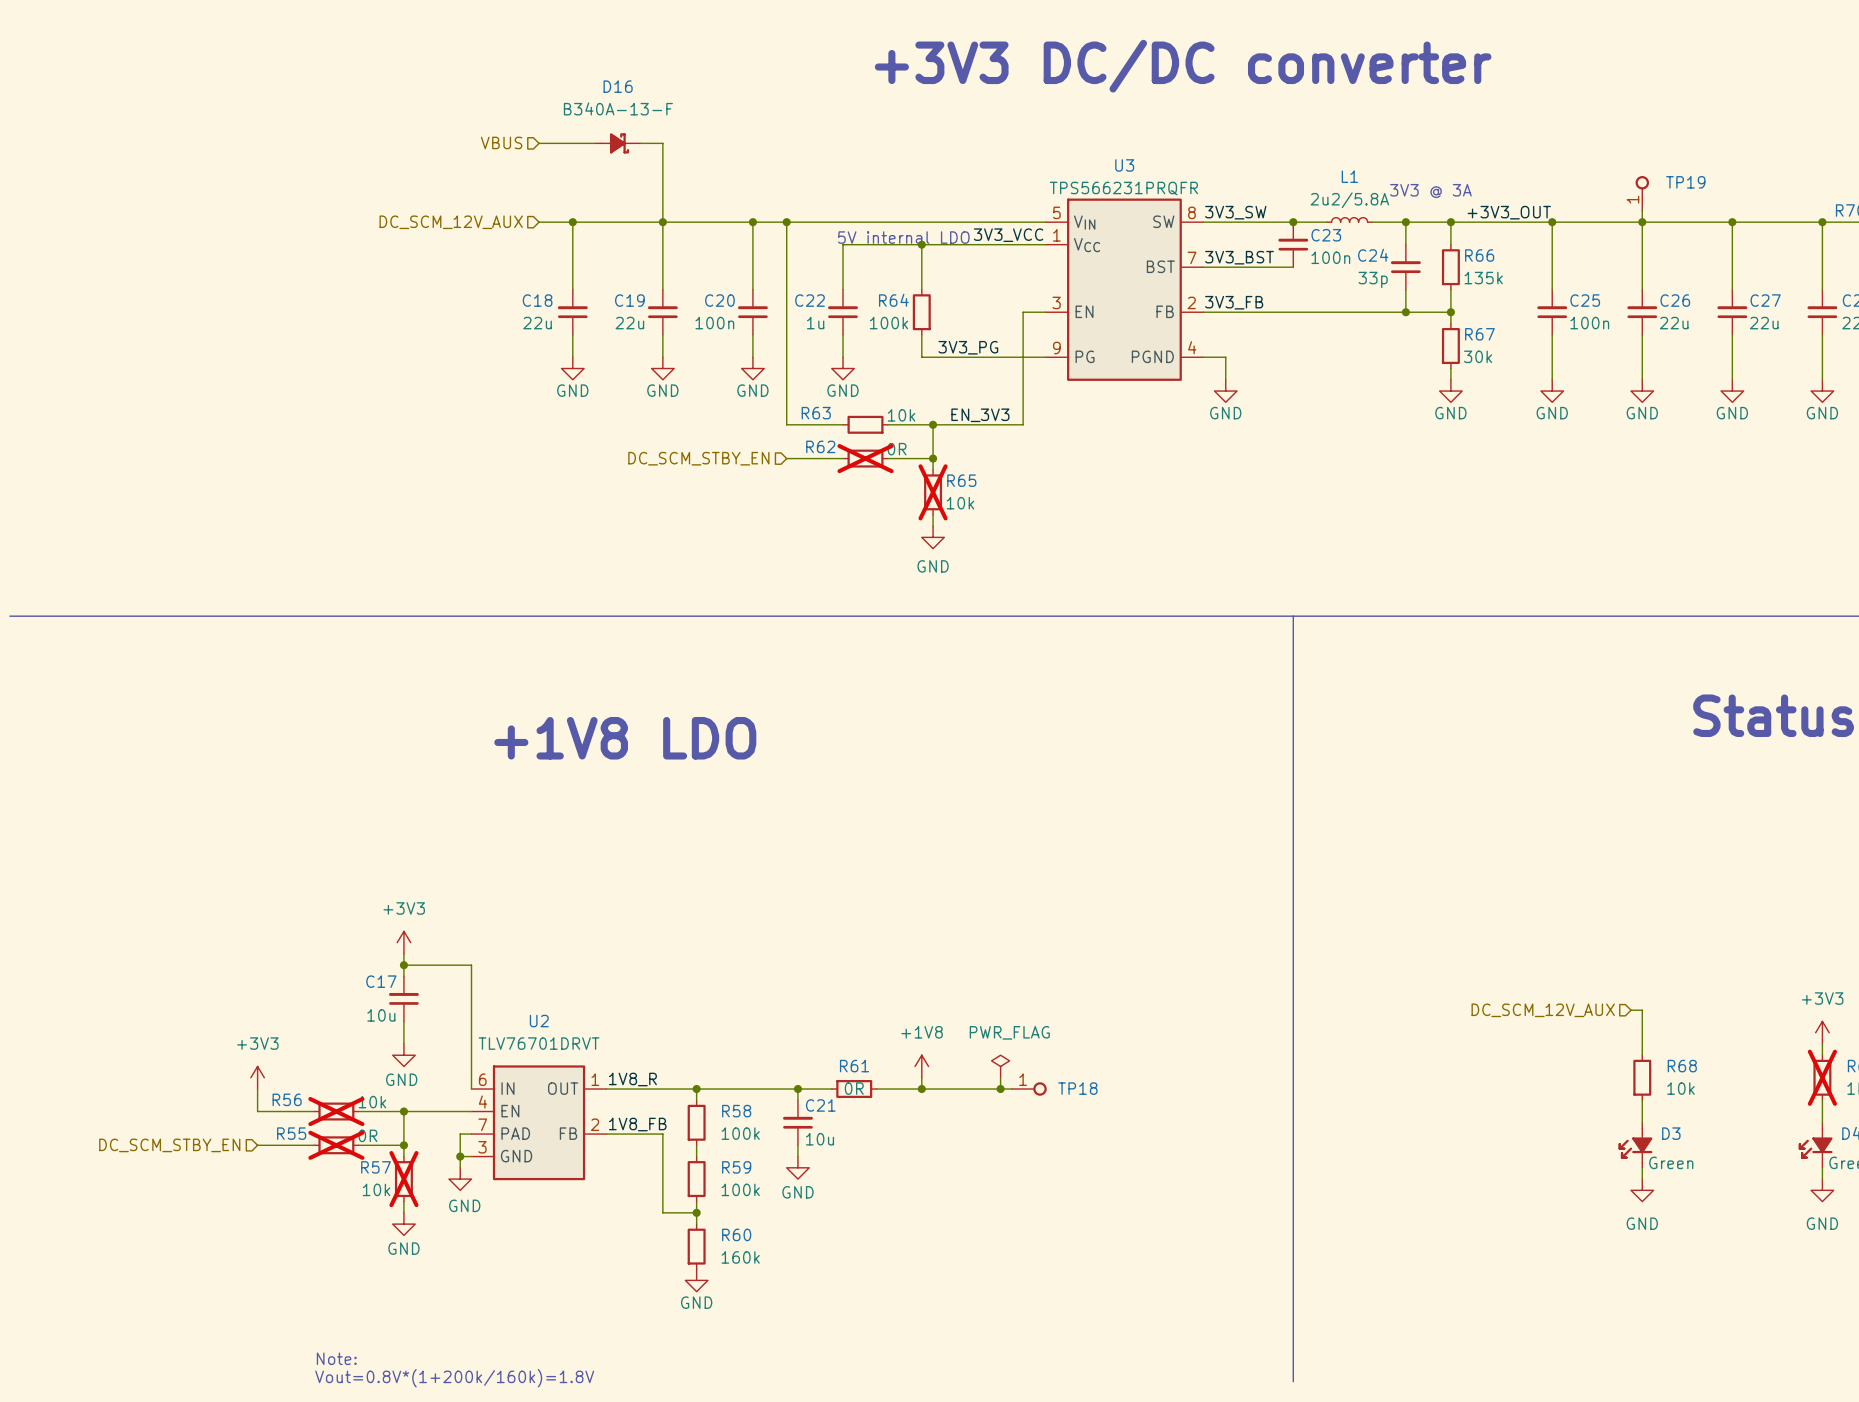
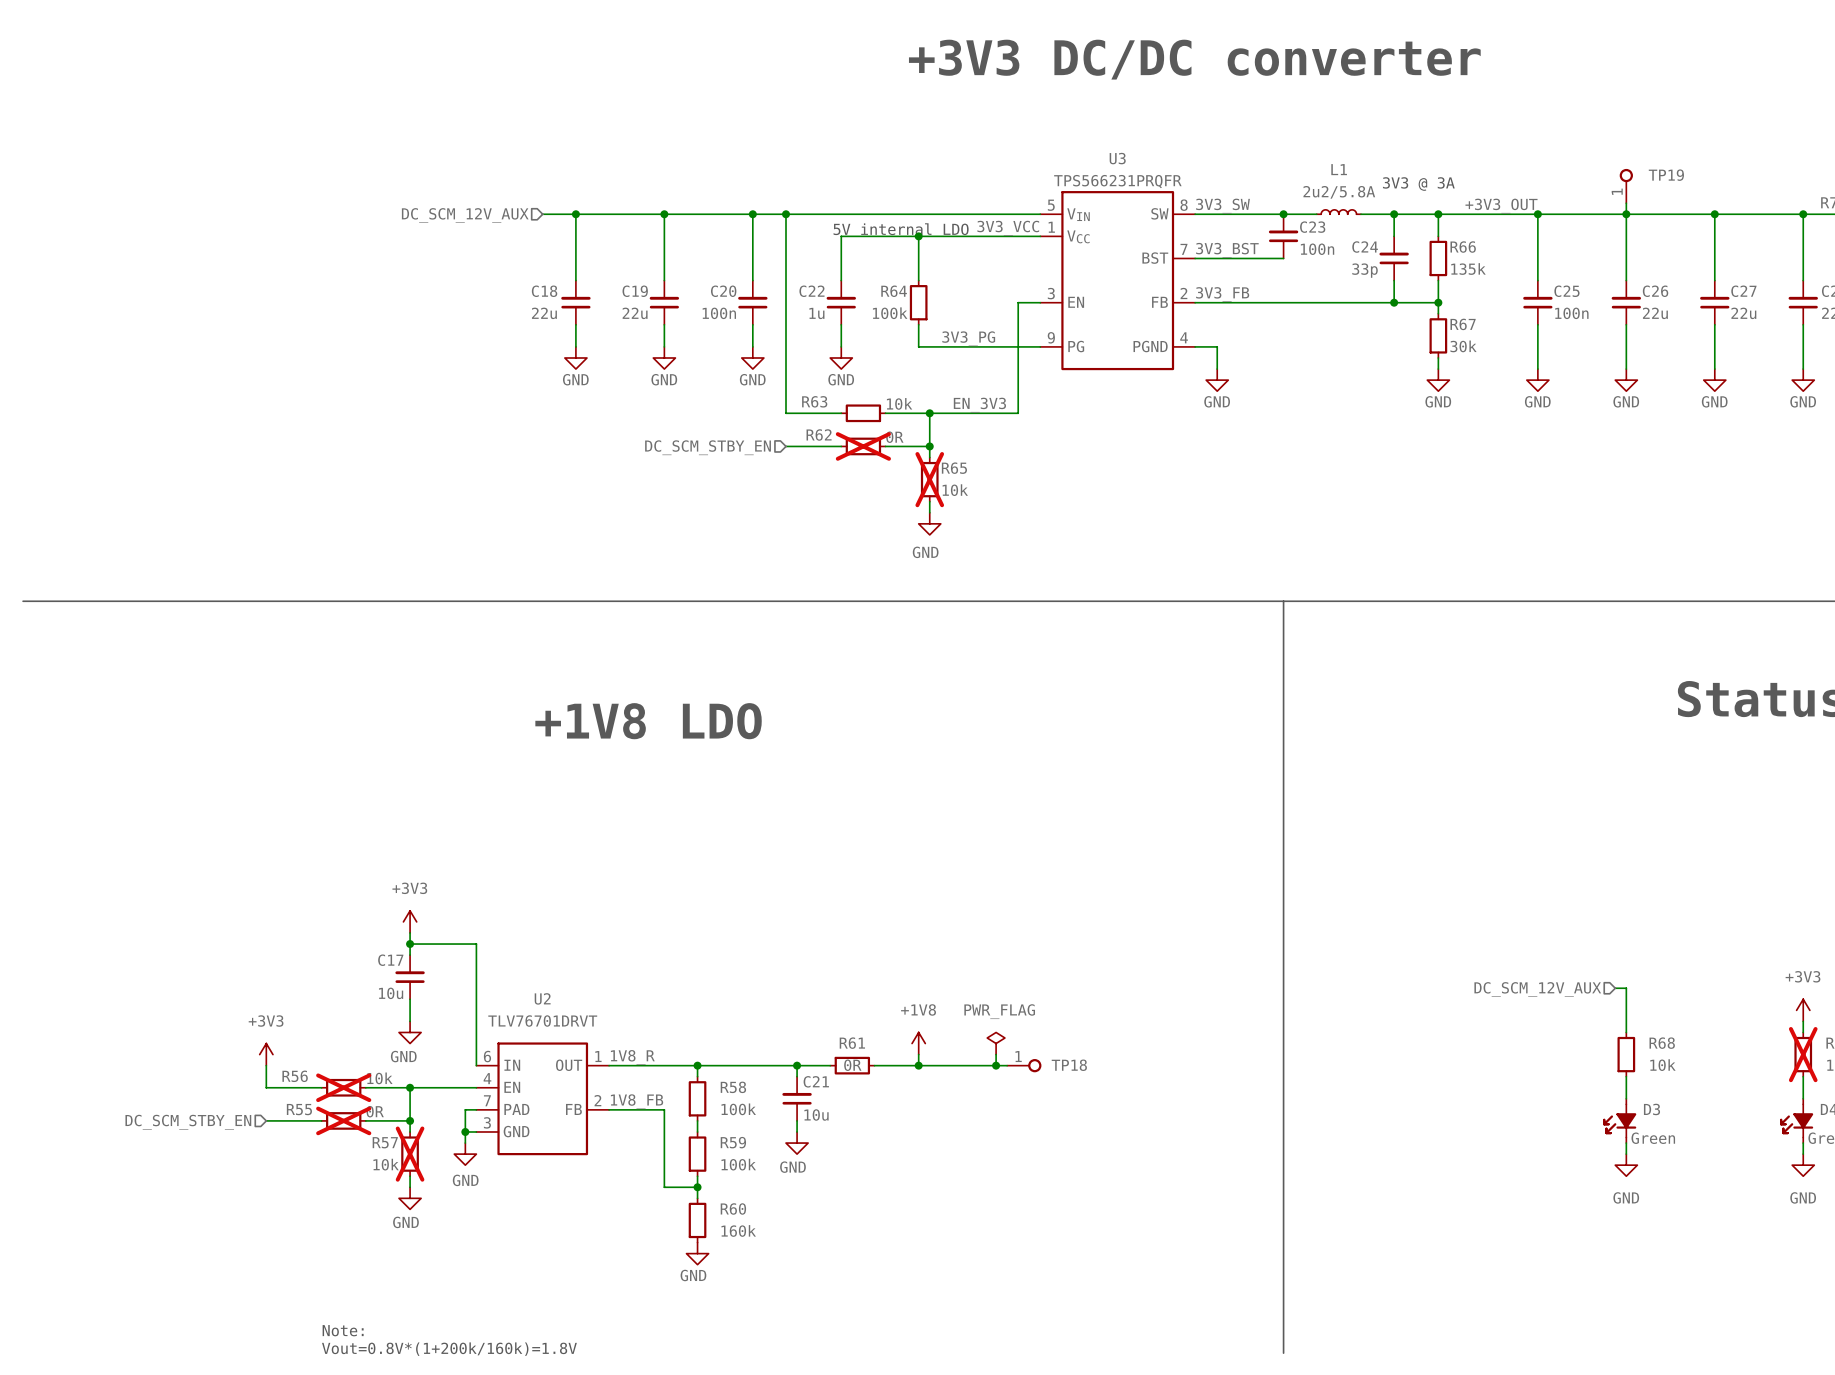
hierarchical label: VBUS (501, 142) -> none
wire: (539, 143) (595, 143) -> none
D16: (617, 143) -> none
wire: (640, 143) (662, 143) (662, 222) -> none

